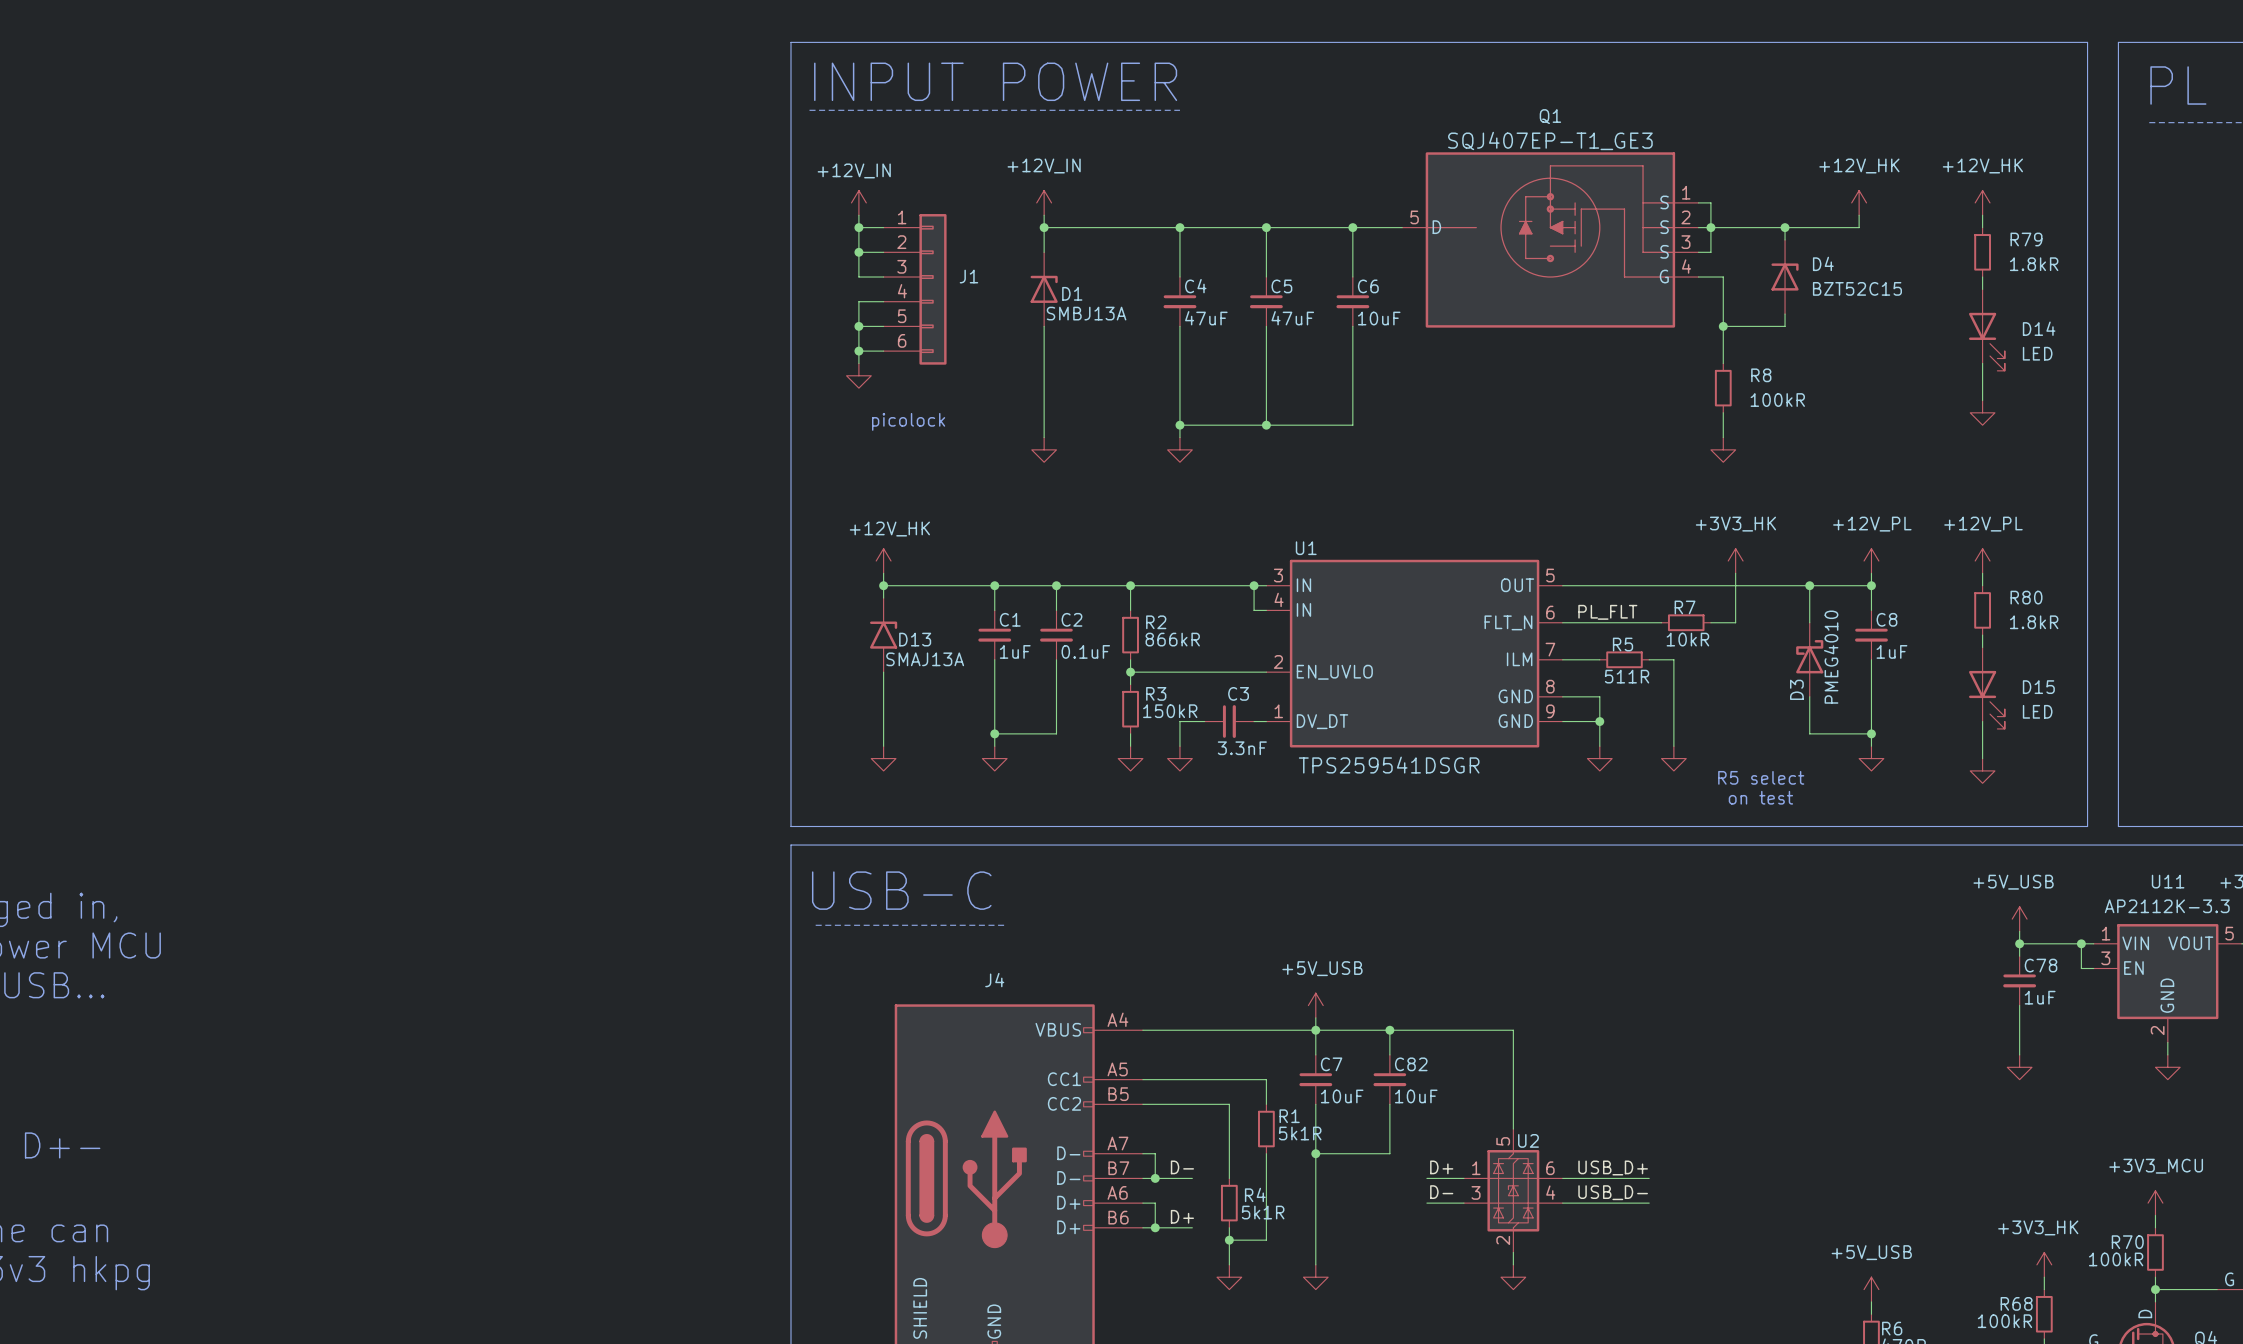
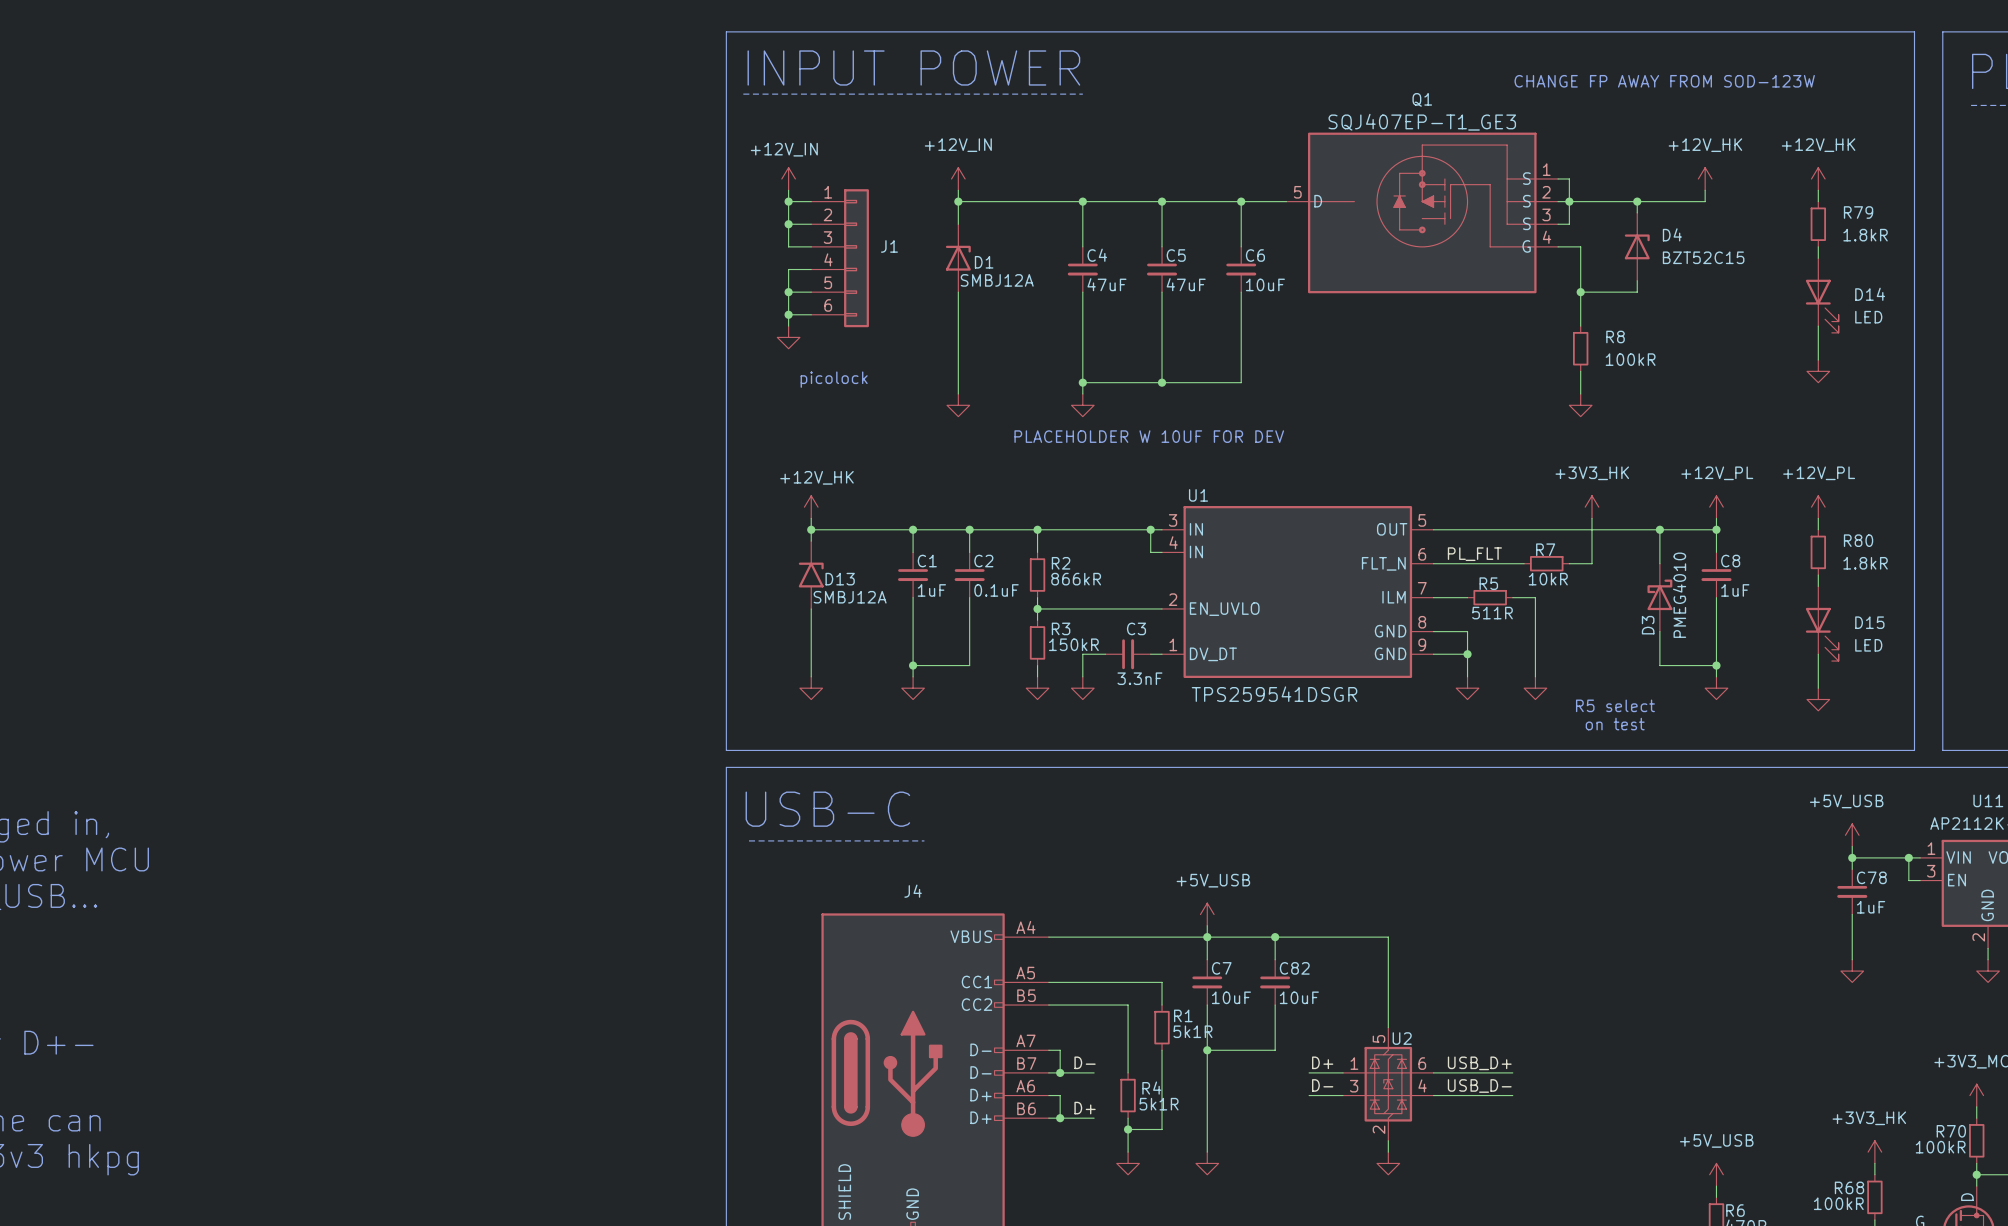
text: none -> CHANGE FP AWAY FROM SOD-123W (1664, 81)
D1 value: SMBJ13A (1086, 313) -> SMBJ12A (997, 280)
text: none -> PLACEHOLDER W 10UF FOR DEV (1149, 436)
D13 value: SMAJ13A (925, 659) -> SMBJ12A (850, 597)

